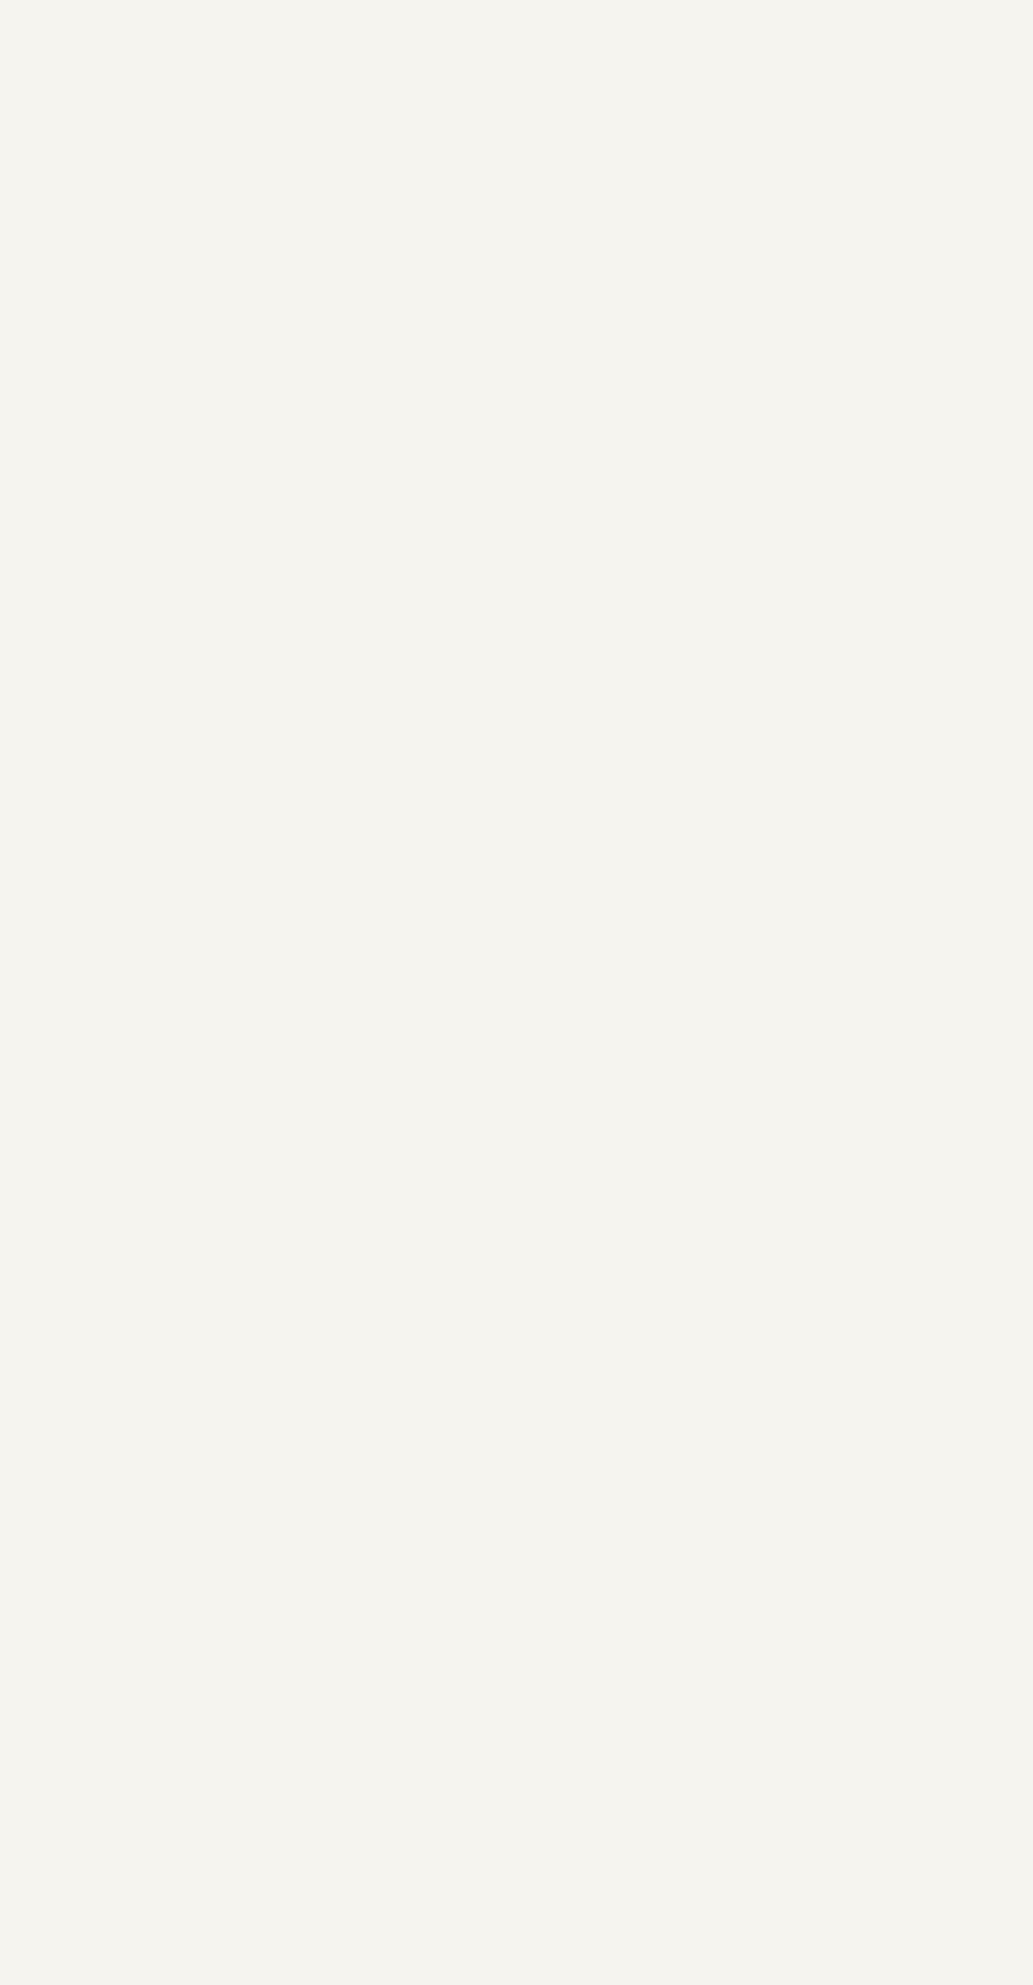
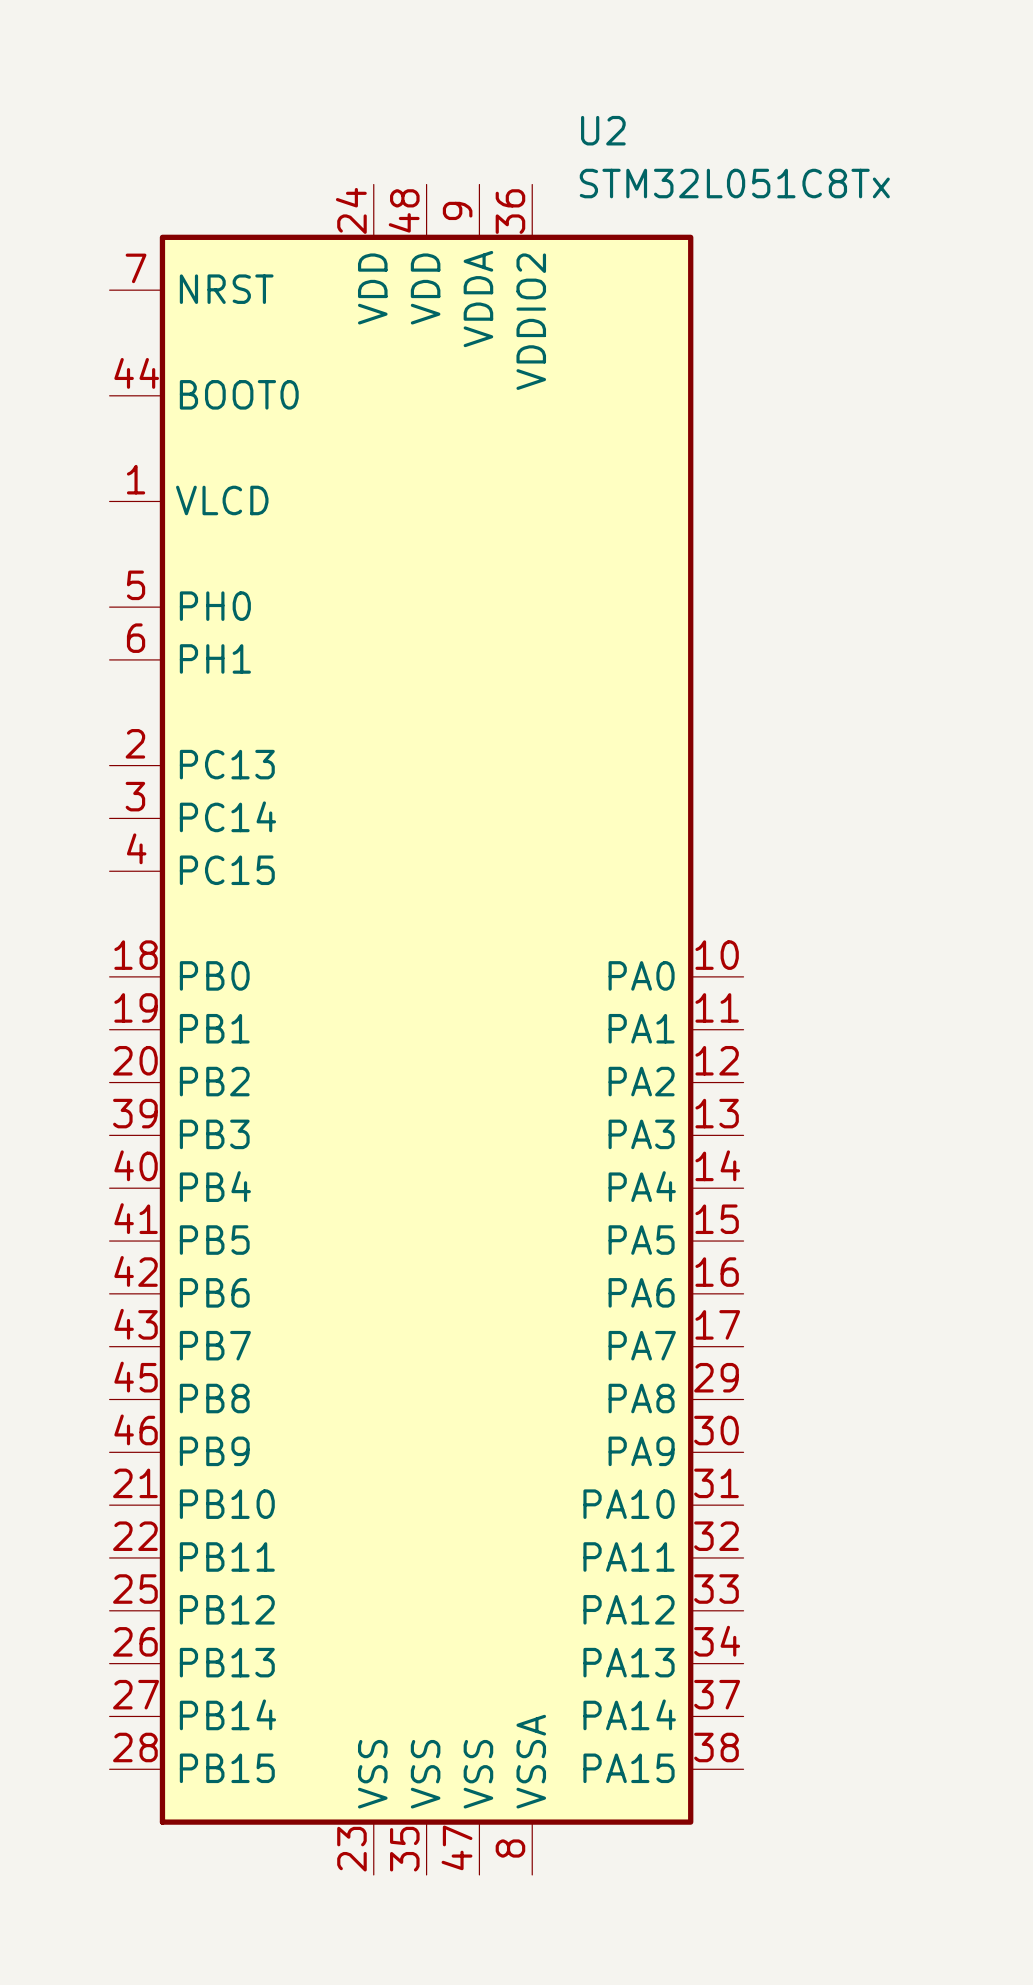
U2: none -> STM32L051C8Tx (426, 1029)

